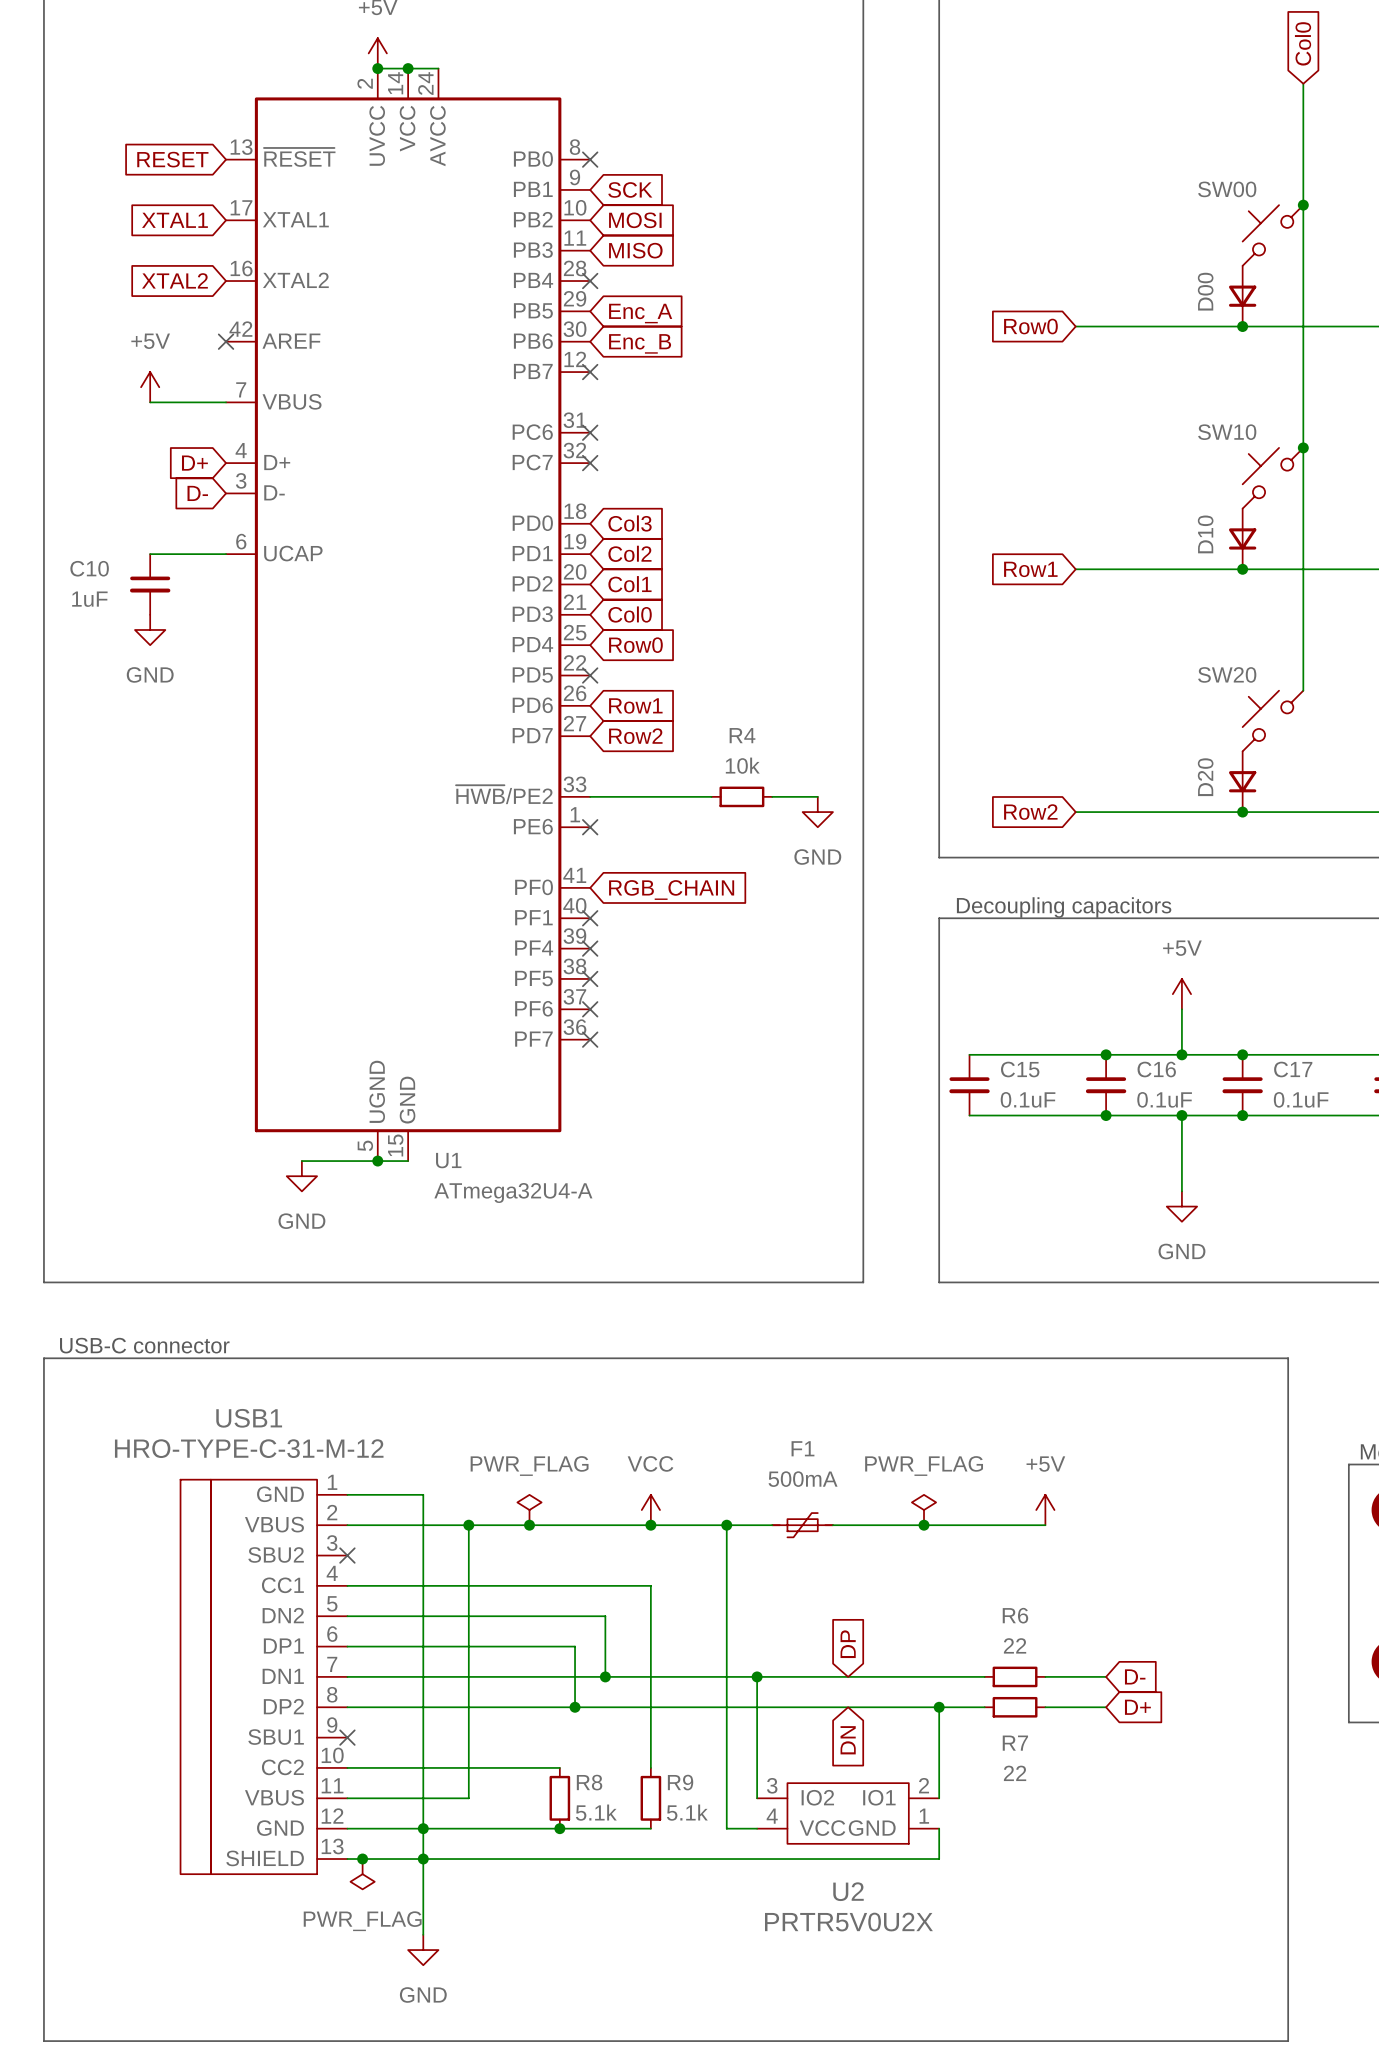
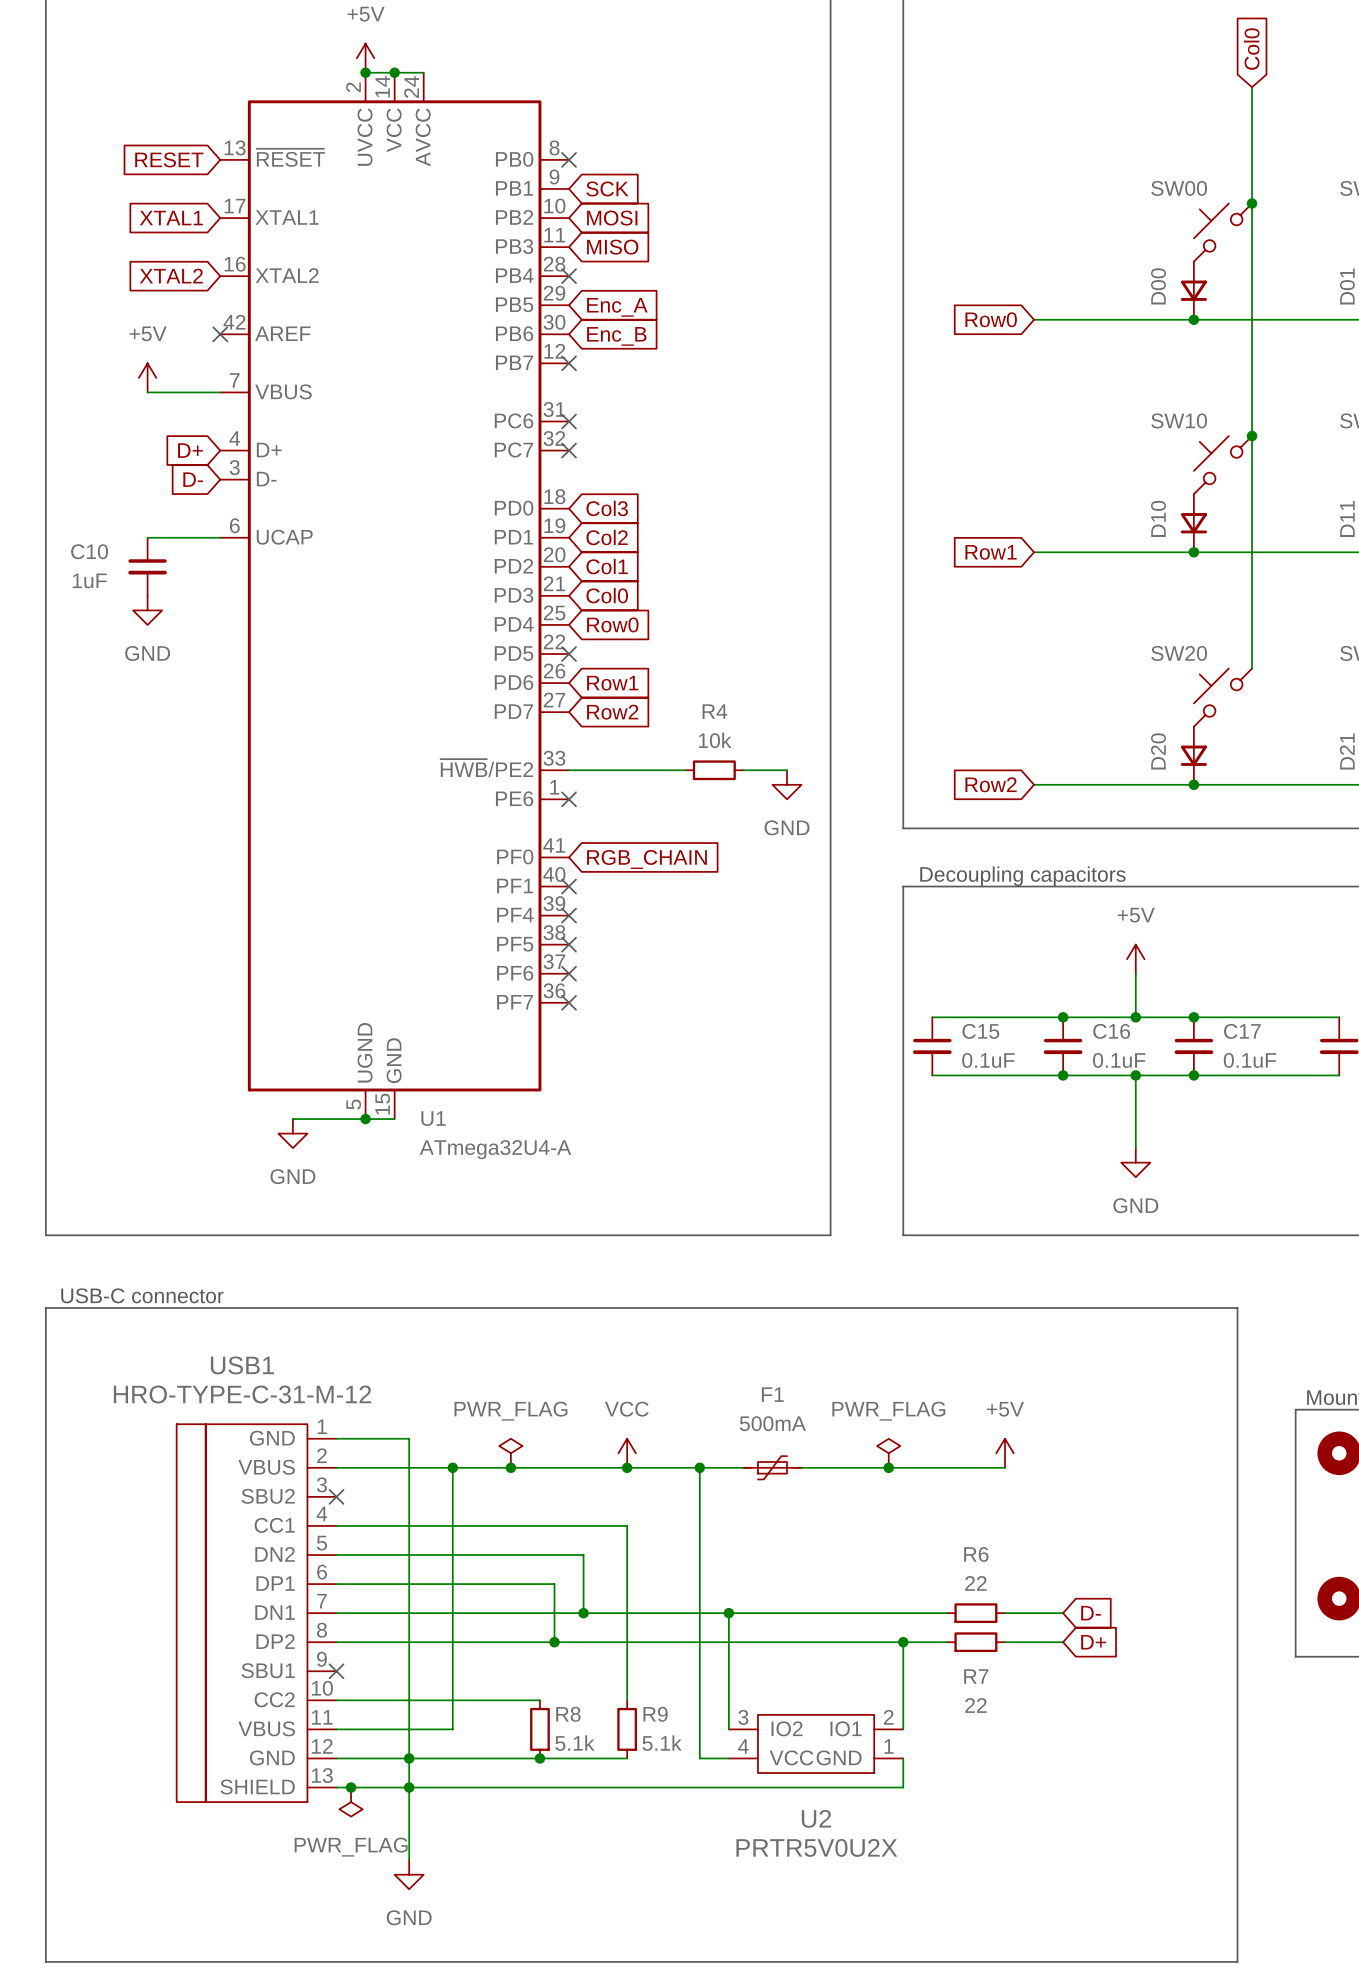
global label: DP (848, 1644) -> none
global label: DN (848, 1740) -> none

